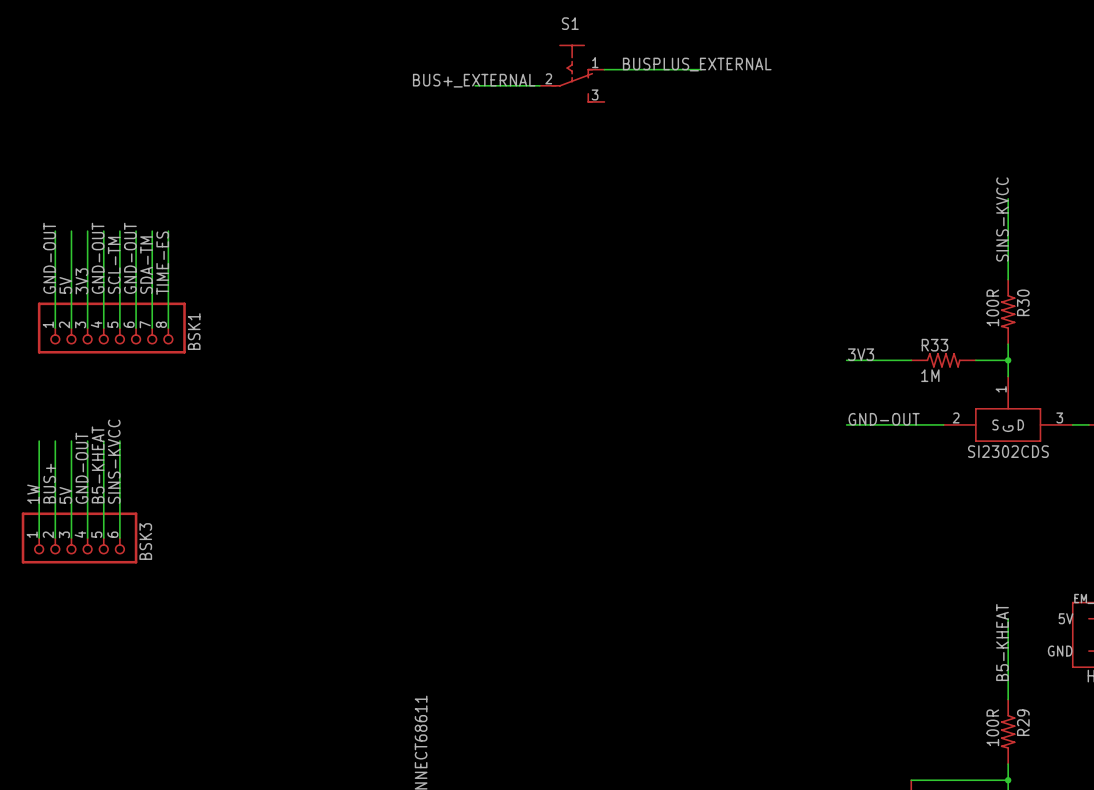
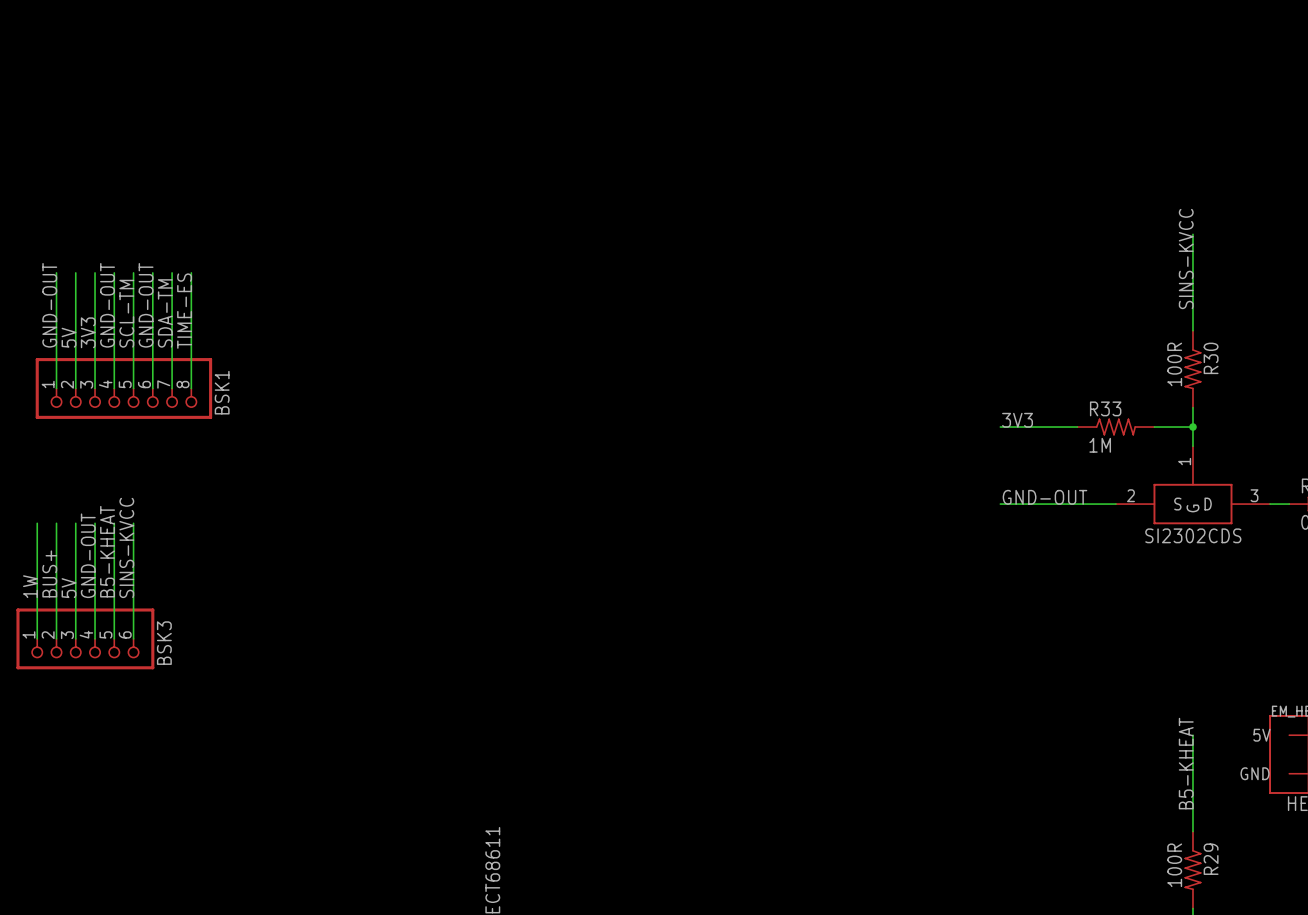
label: BUSPLUS_EXTERNAL (697, 64) -> none
wire: (604, 69) (701, 69) -> none
S1: (572, 73) -> none
label: BUS+_EXTERNAL (474, 80) -> none
wire: (475, 85) (539, 85) -> none

